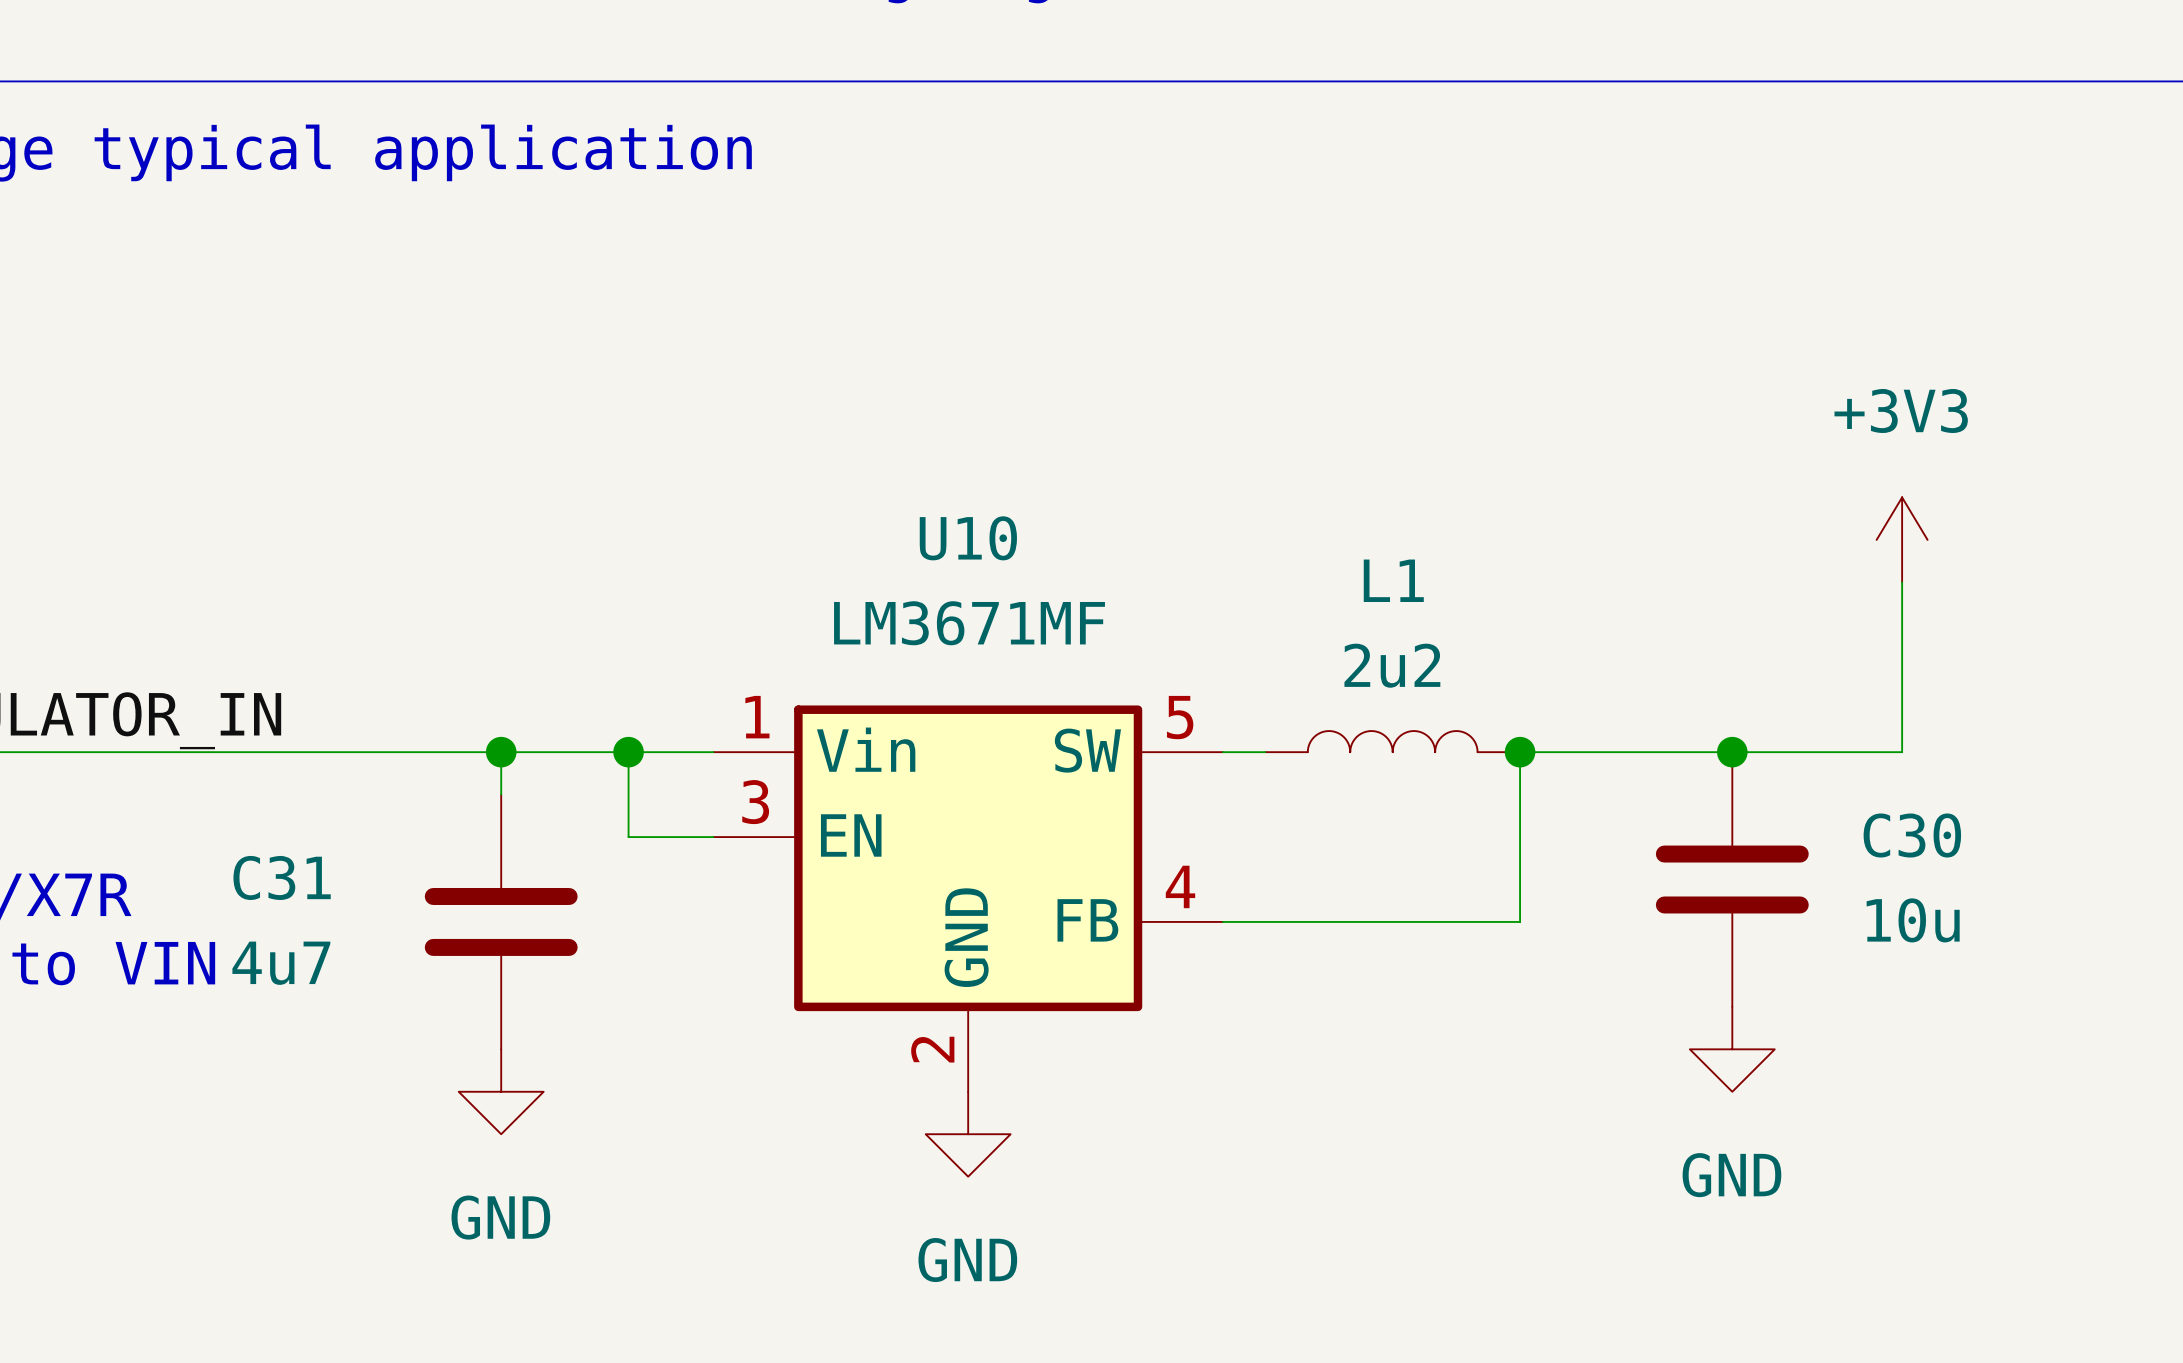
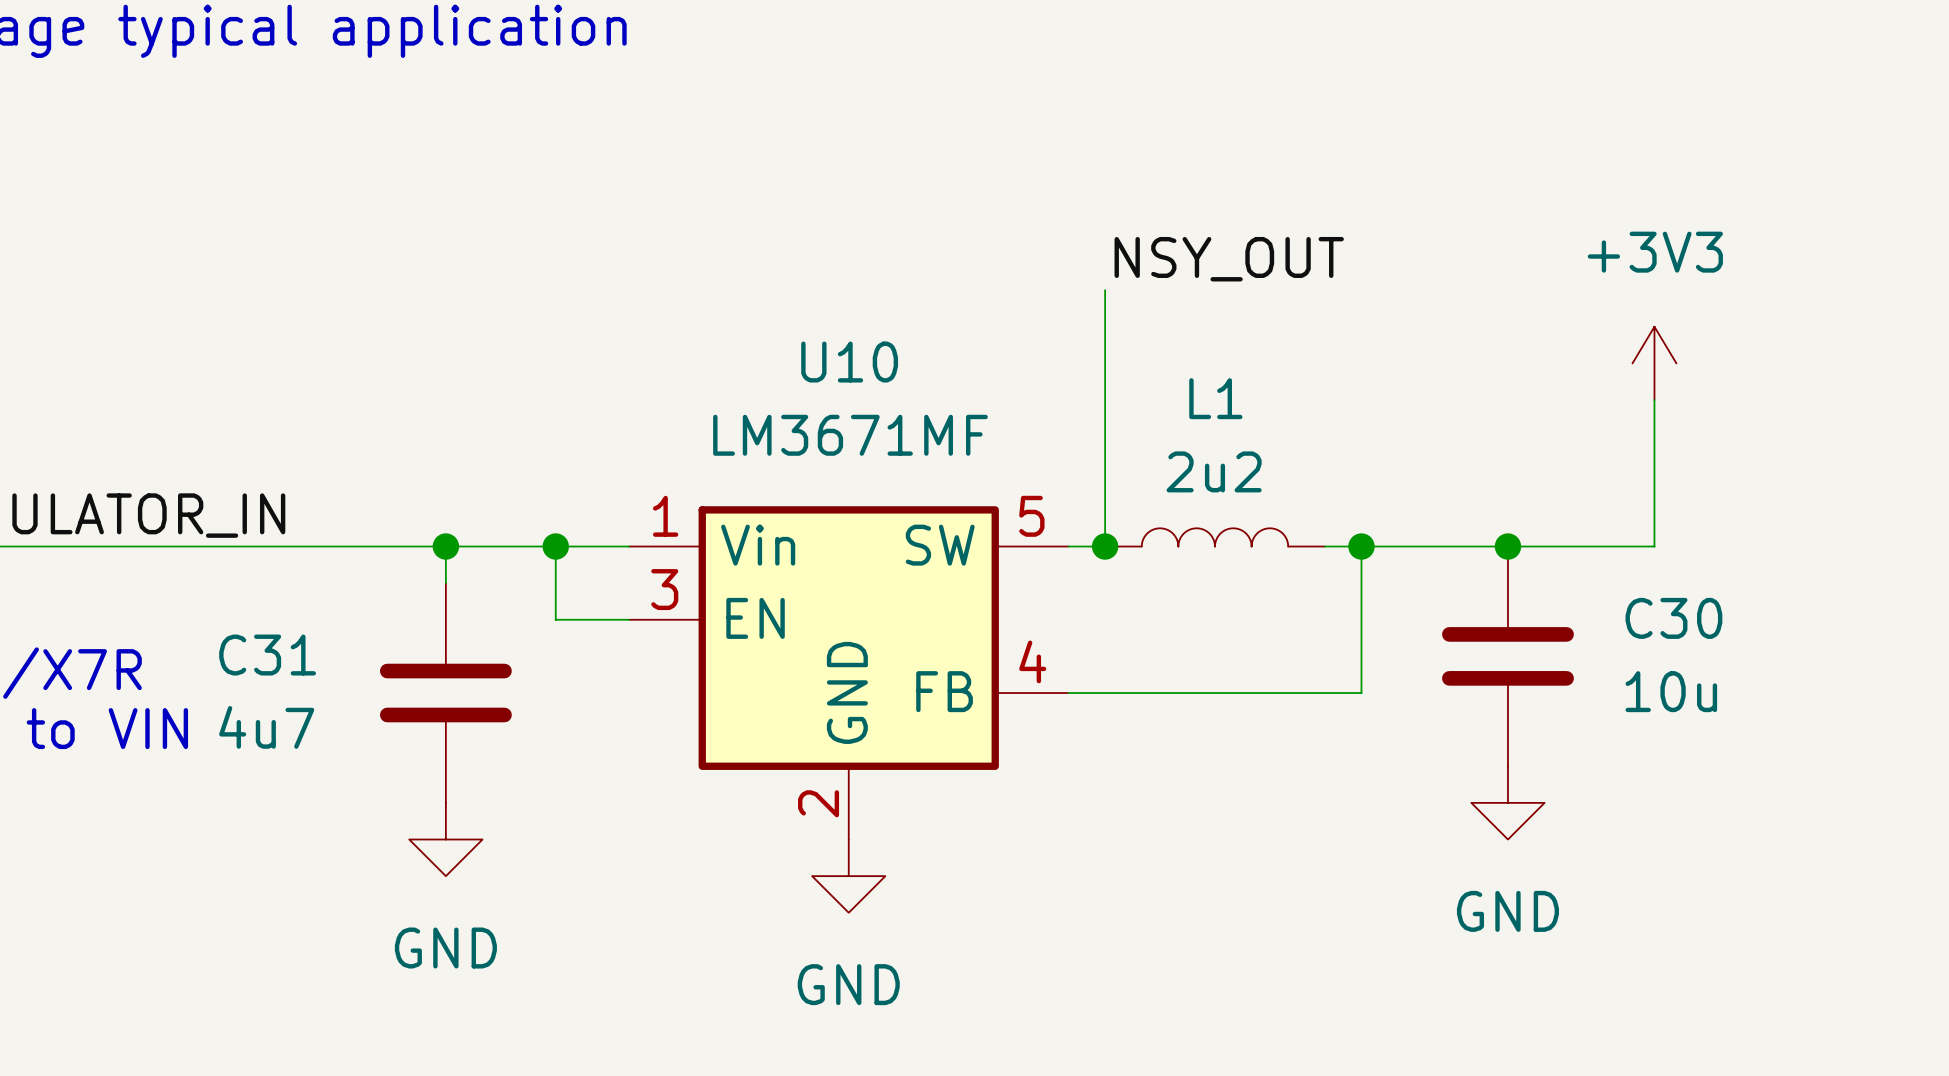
label: none -> NSY_OUT (1229, 259)
wire: none -> (1105, 290) (1105, 546)
junction: none -> (1105, 546)
wire: (1520, 752) (1520, 921) -> (1361, 546) (1361, 693) (1324, 693)
junction position: (1520, 752) -> (1361, 546)

